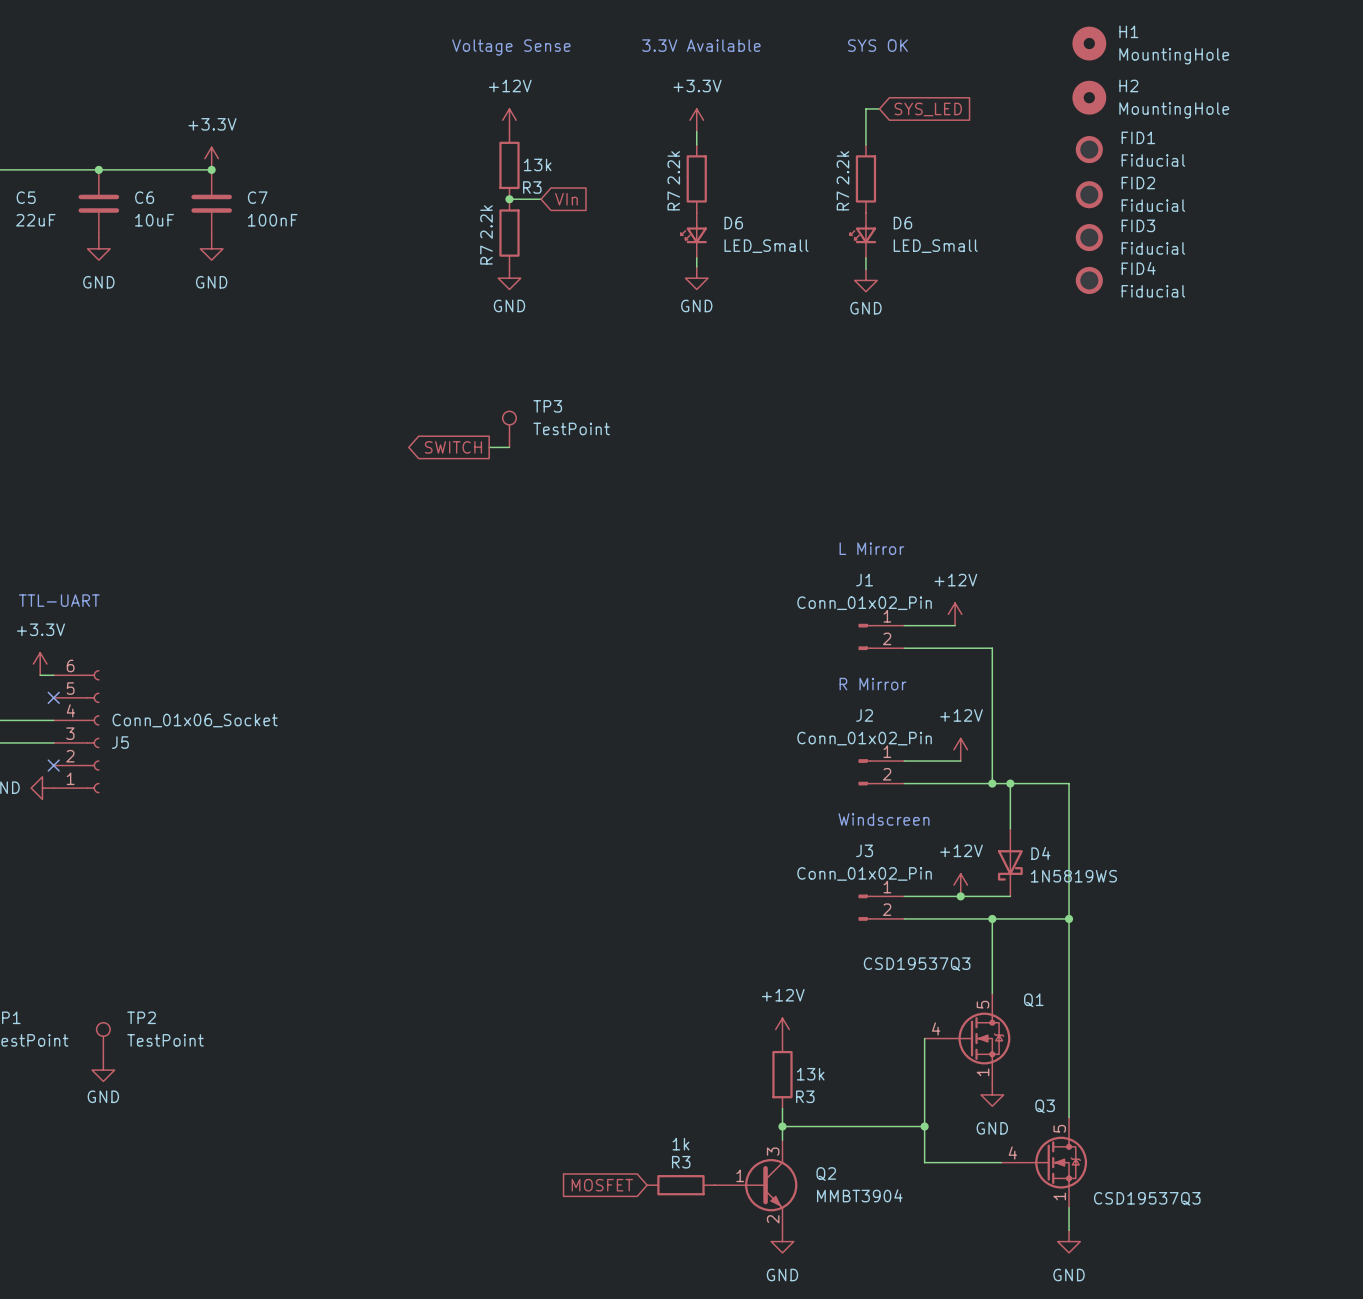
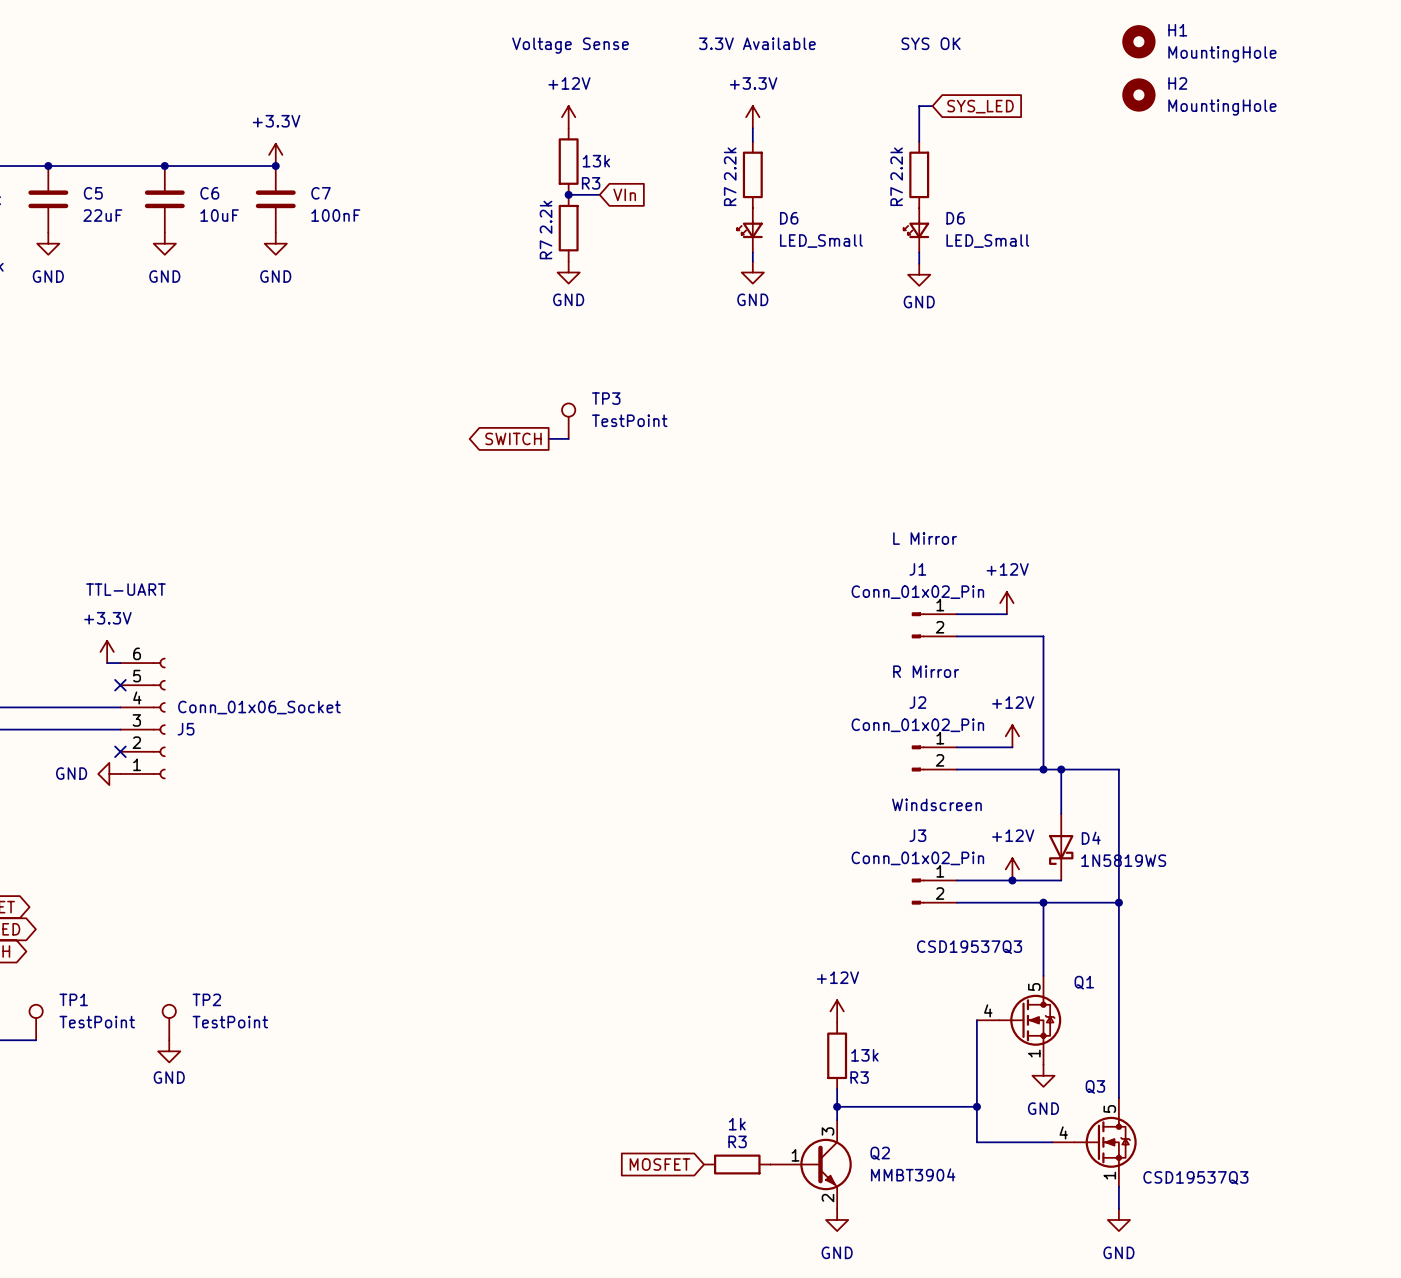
FID1: Fiducial (1089, 149) -> none
FID2: Fiducial (1089, 194) -> none
FID3: Fiducial (1089, 237) -> none
FID4: Fiducial (1089, 280) -> none

